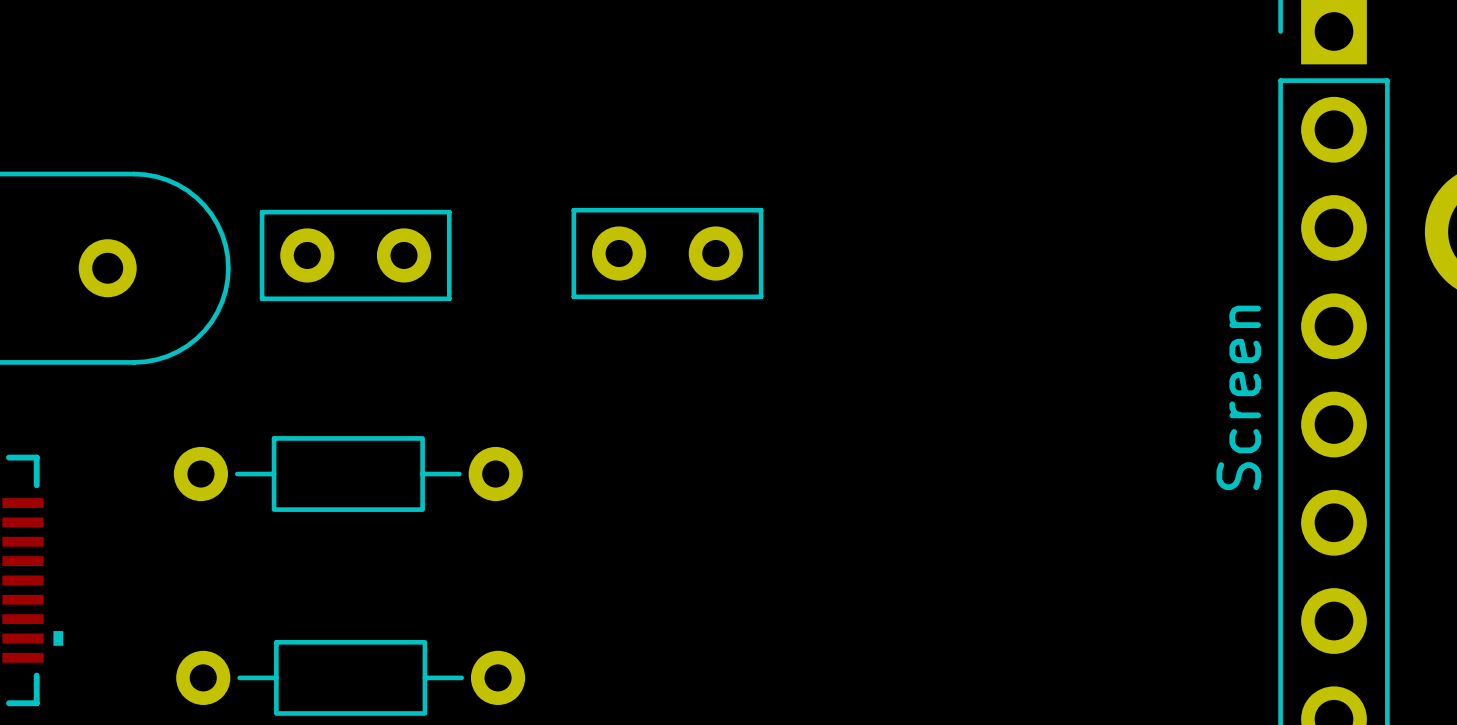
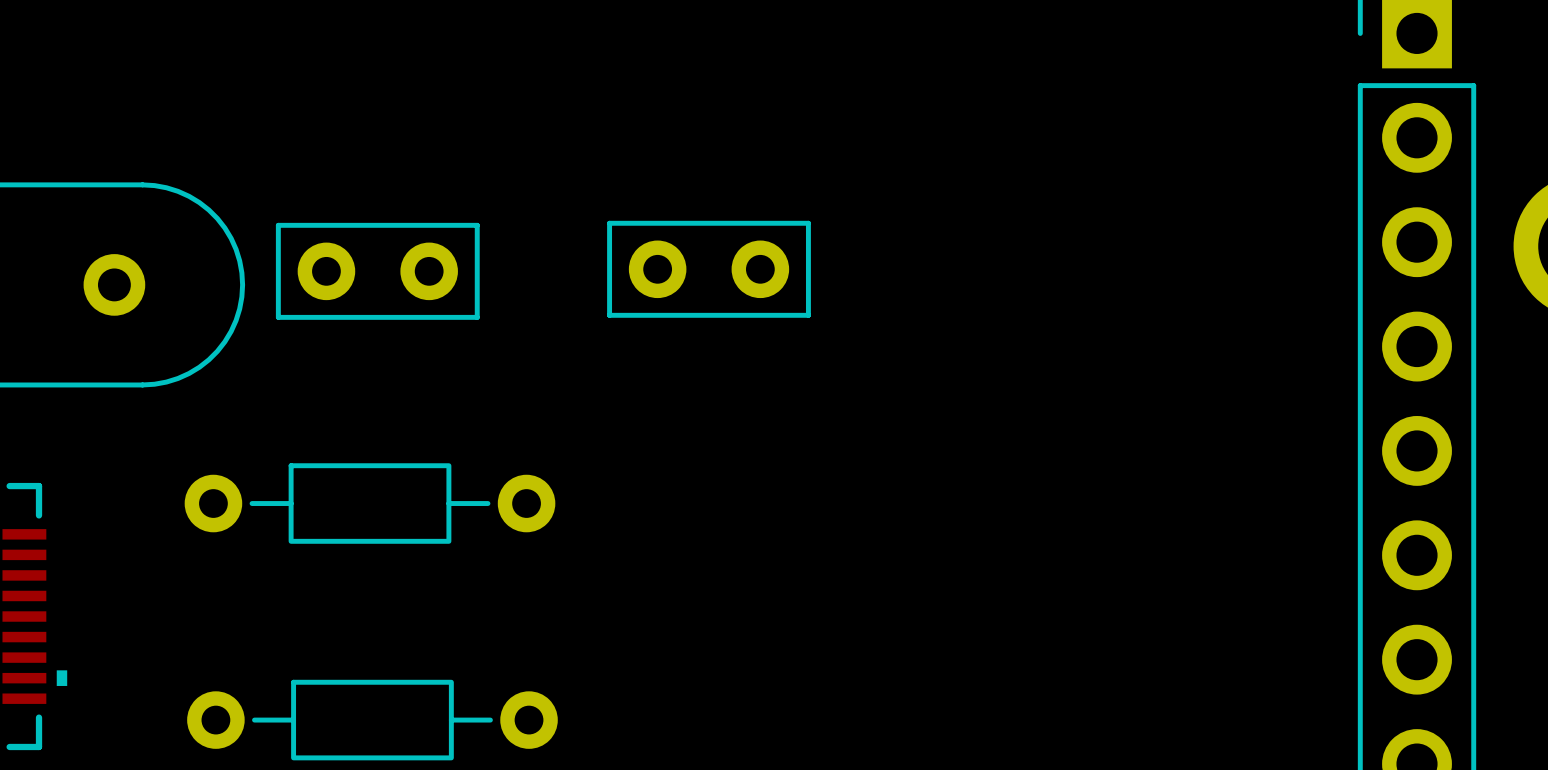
text: Screen (1238, 397) -> none

